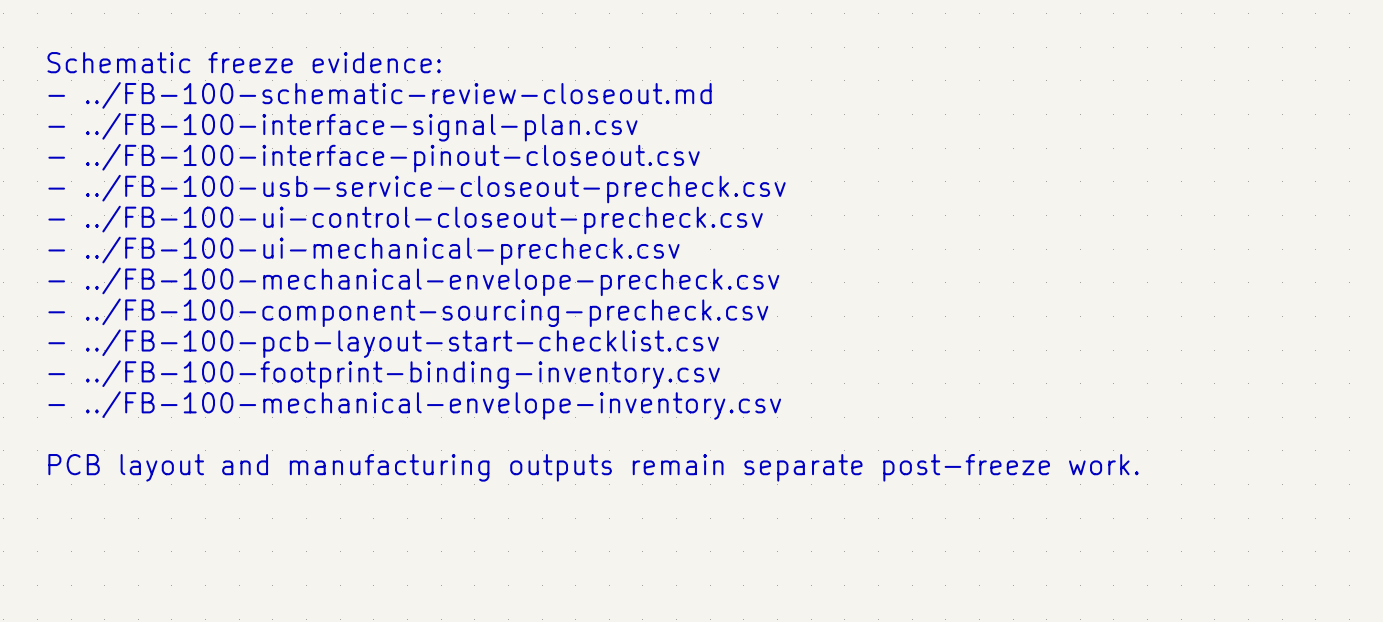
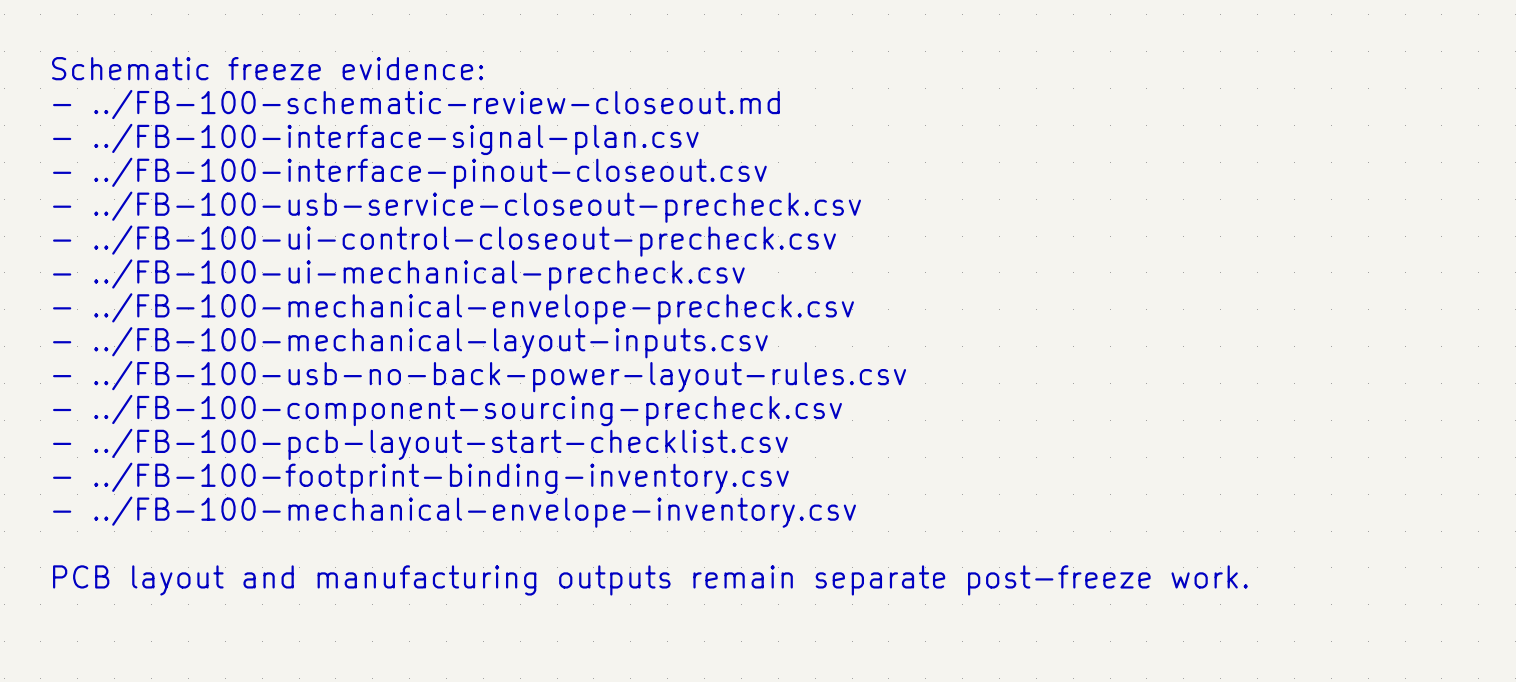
text: - ../FB-100-component-sourcing-precheck.csv (408, 312) -> - ../FB-100-mechanical-layout-inputs.csv (410, 342)
text: - ../FB-100-pcb-layout-start-checklist.csv (383, 343) -> - ../FB-100-usb-no-back-power-layout-rules.csv (479, 376)
text: - ../FB-100-footprint-binding-inventory.csv (384, 374) -> - ../FB-100-component-sourcing-precheck.csv (447, 410)
text: - ../FB-100-mechanical-envelope-inventory.csv (414, 405) -> - ../FB-100-pcb-layout-start-checklist.csv (420, 444)
text: none -> - ../FB-100-footprint-binding-inventory.csv (420, 478)
text: PCB layout and manufacturing outputs remain separate post-freeze work. (593, 467) -> - ../FB-100-mechanical-envelope-inventory.csv (454, 512)
text: none -> PCB layout and manufacturing outputs remain separate post-freeze work. (650, 580)

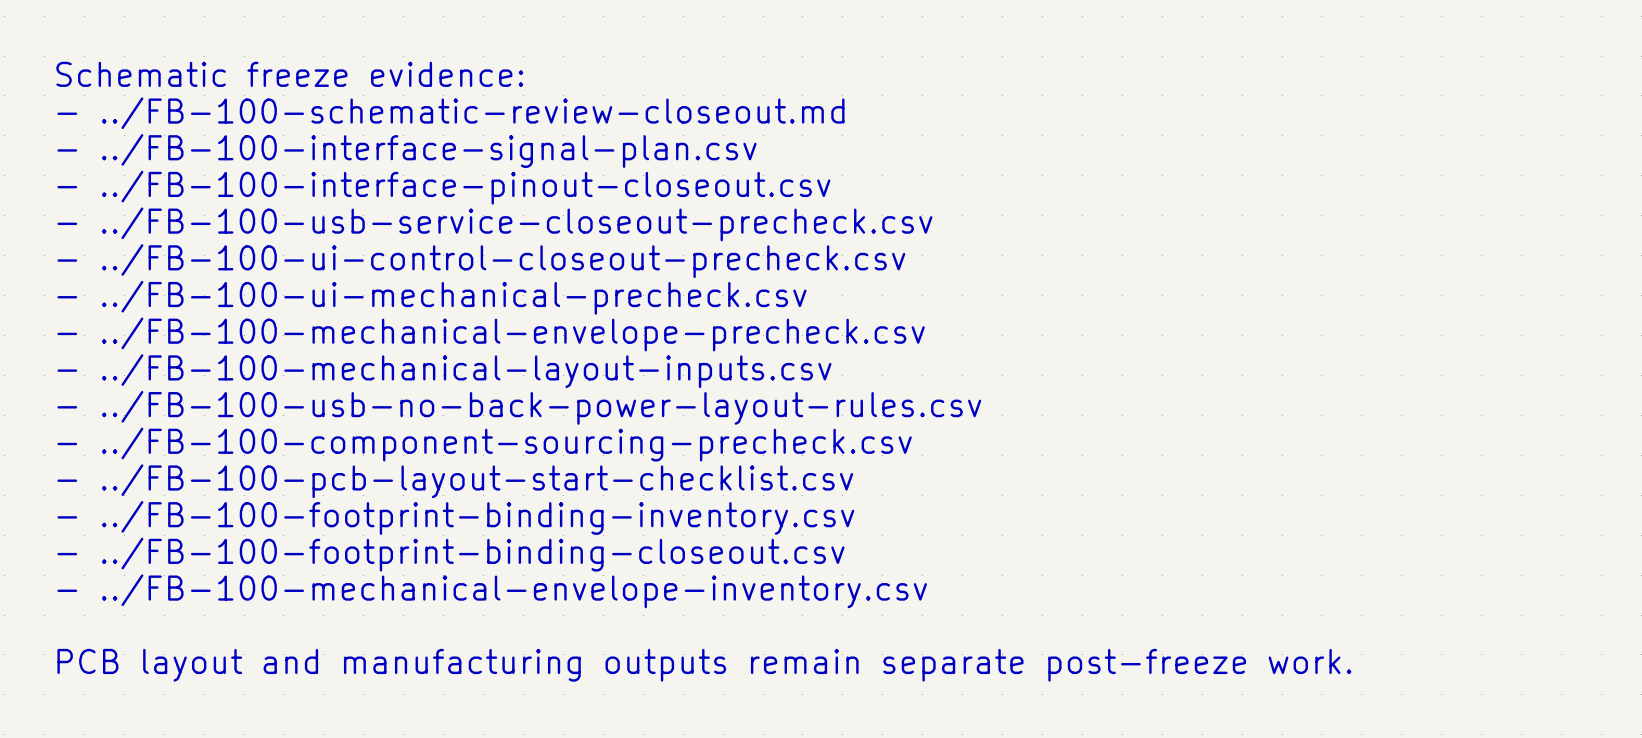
text: - ../FB-100-mechanical-envelope-inventory.csv (454, 512) -> - ../FB-100-footprint-binding-closeout.csv (450, 554)
text: none -> - ../FB-100-mechanical-envelope-inventory.csv (492, 591)
text position: PCB layout and manufacturing outputs remain separate post-freeze work. (650, 580) -> PCB layout and manufacturing outputs remain separate post-freeze work. (704, 665)

